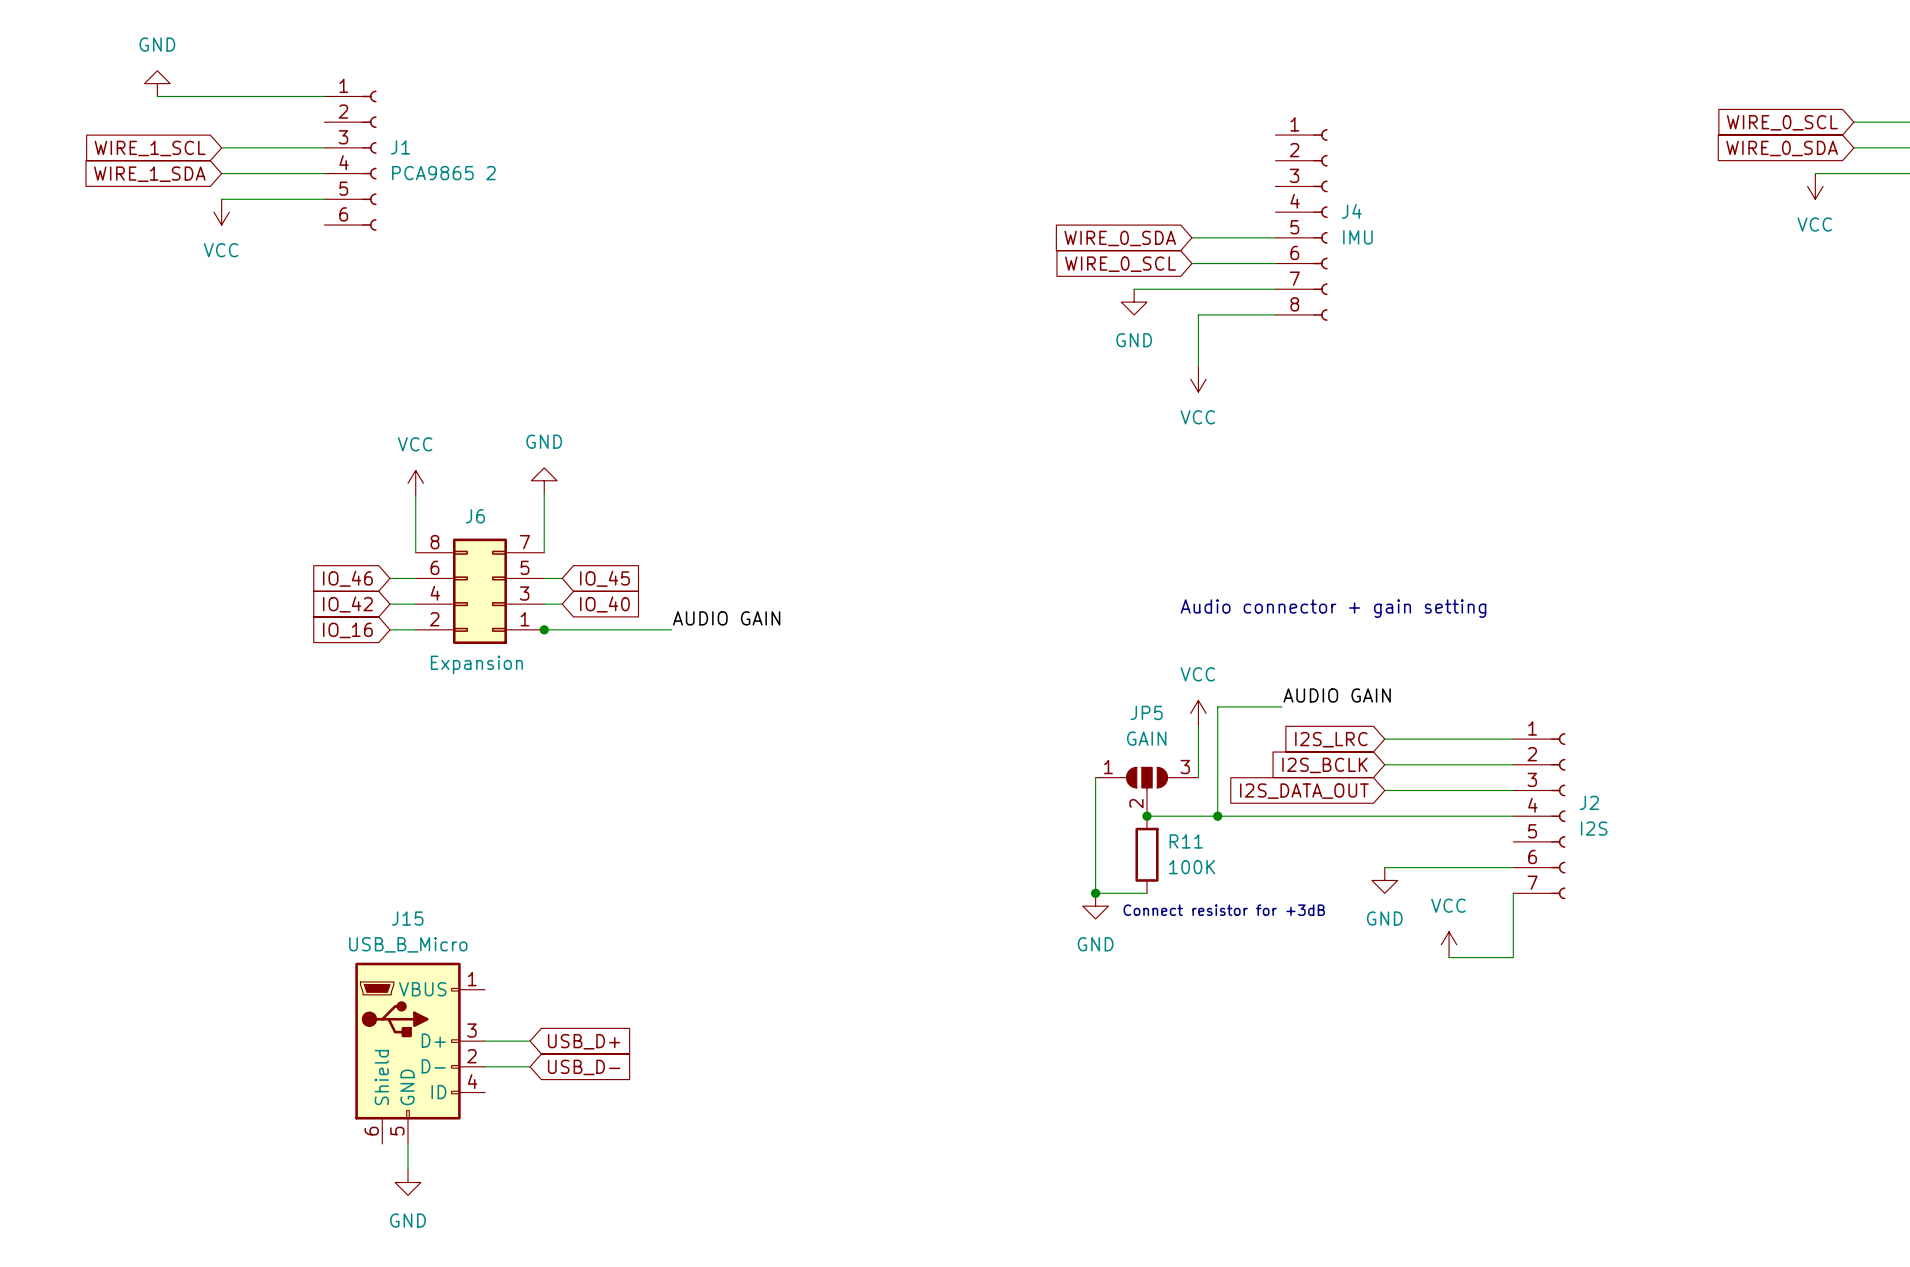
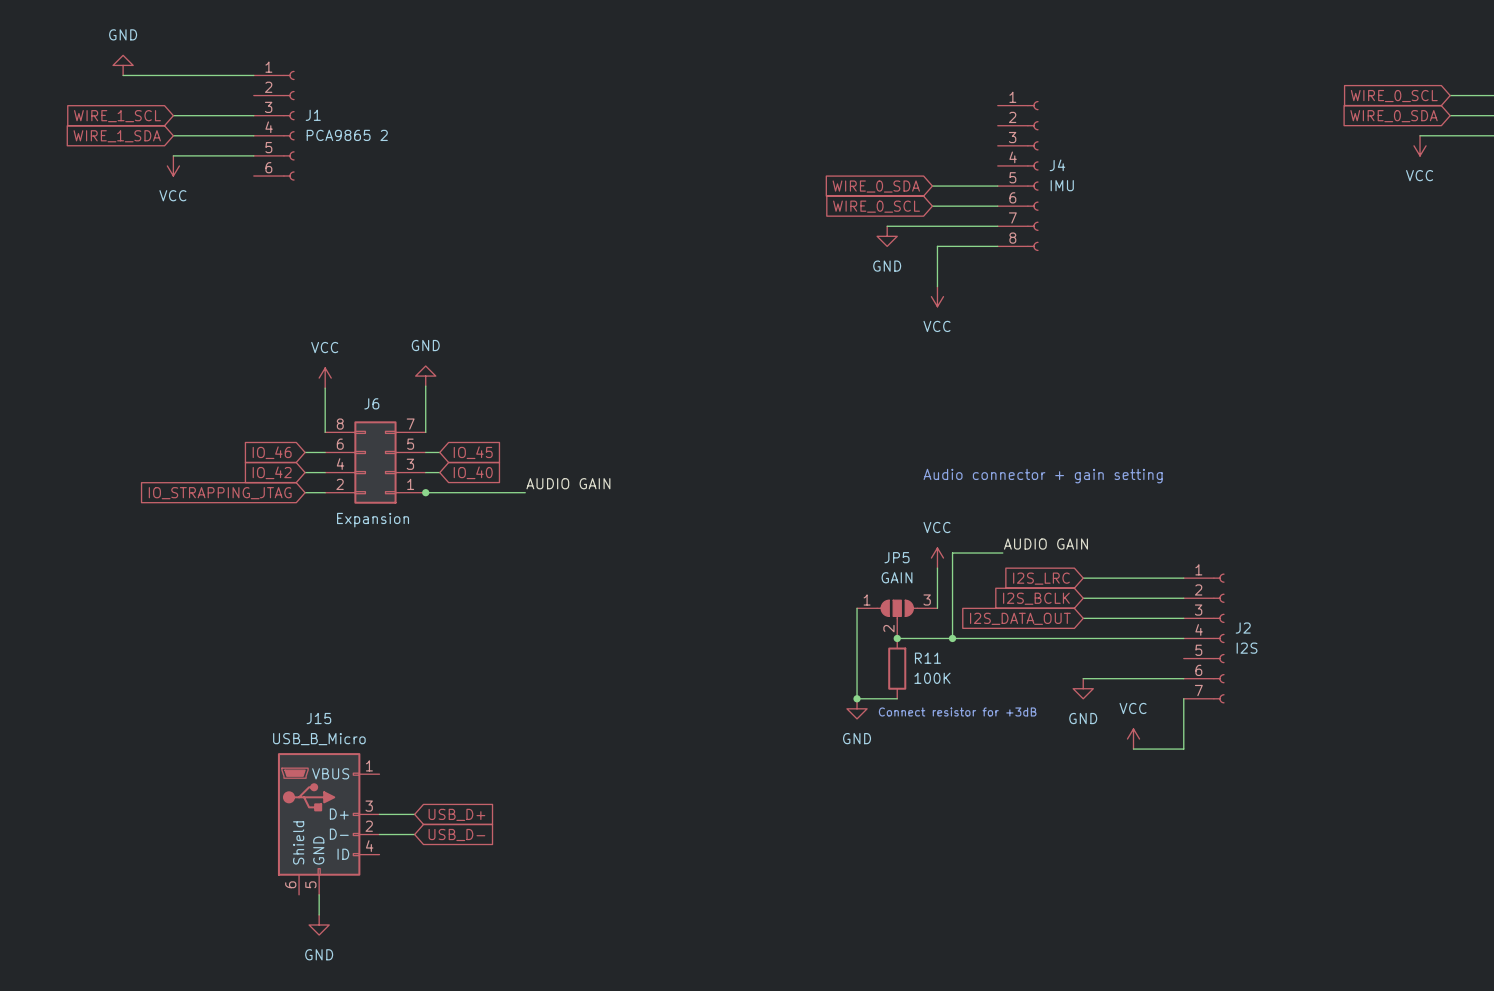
global label: IO_16 (347, 630) -> IO_STRAPPING_JTAG (220, 493)

